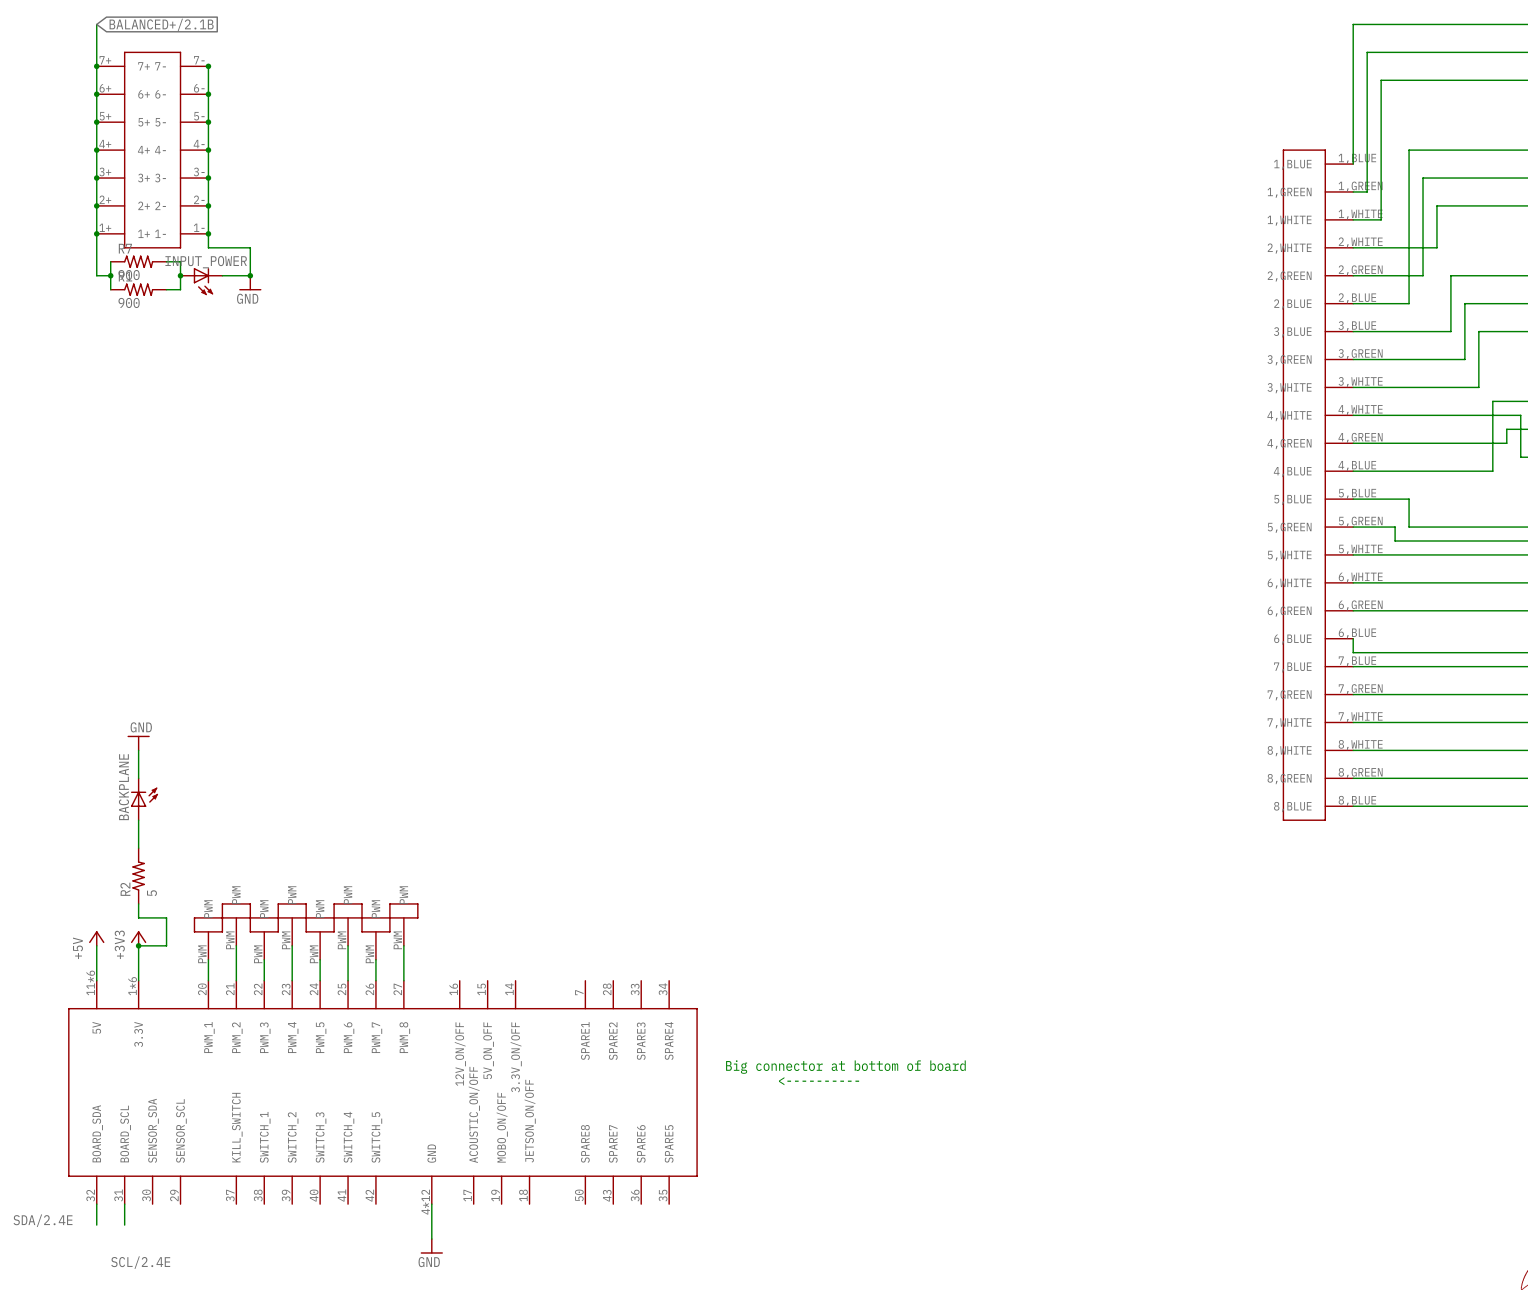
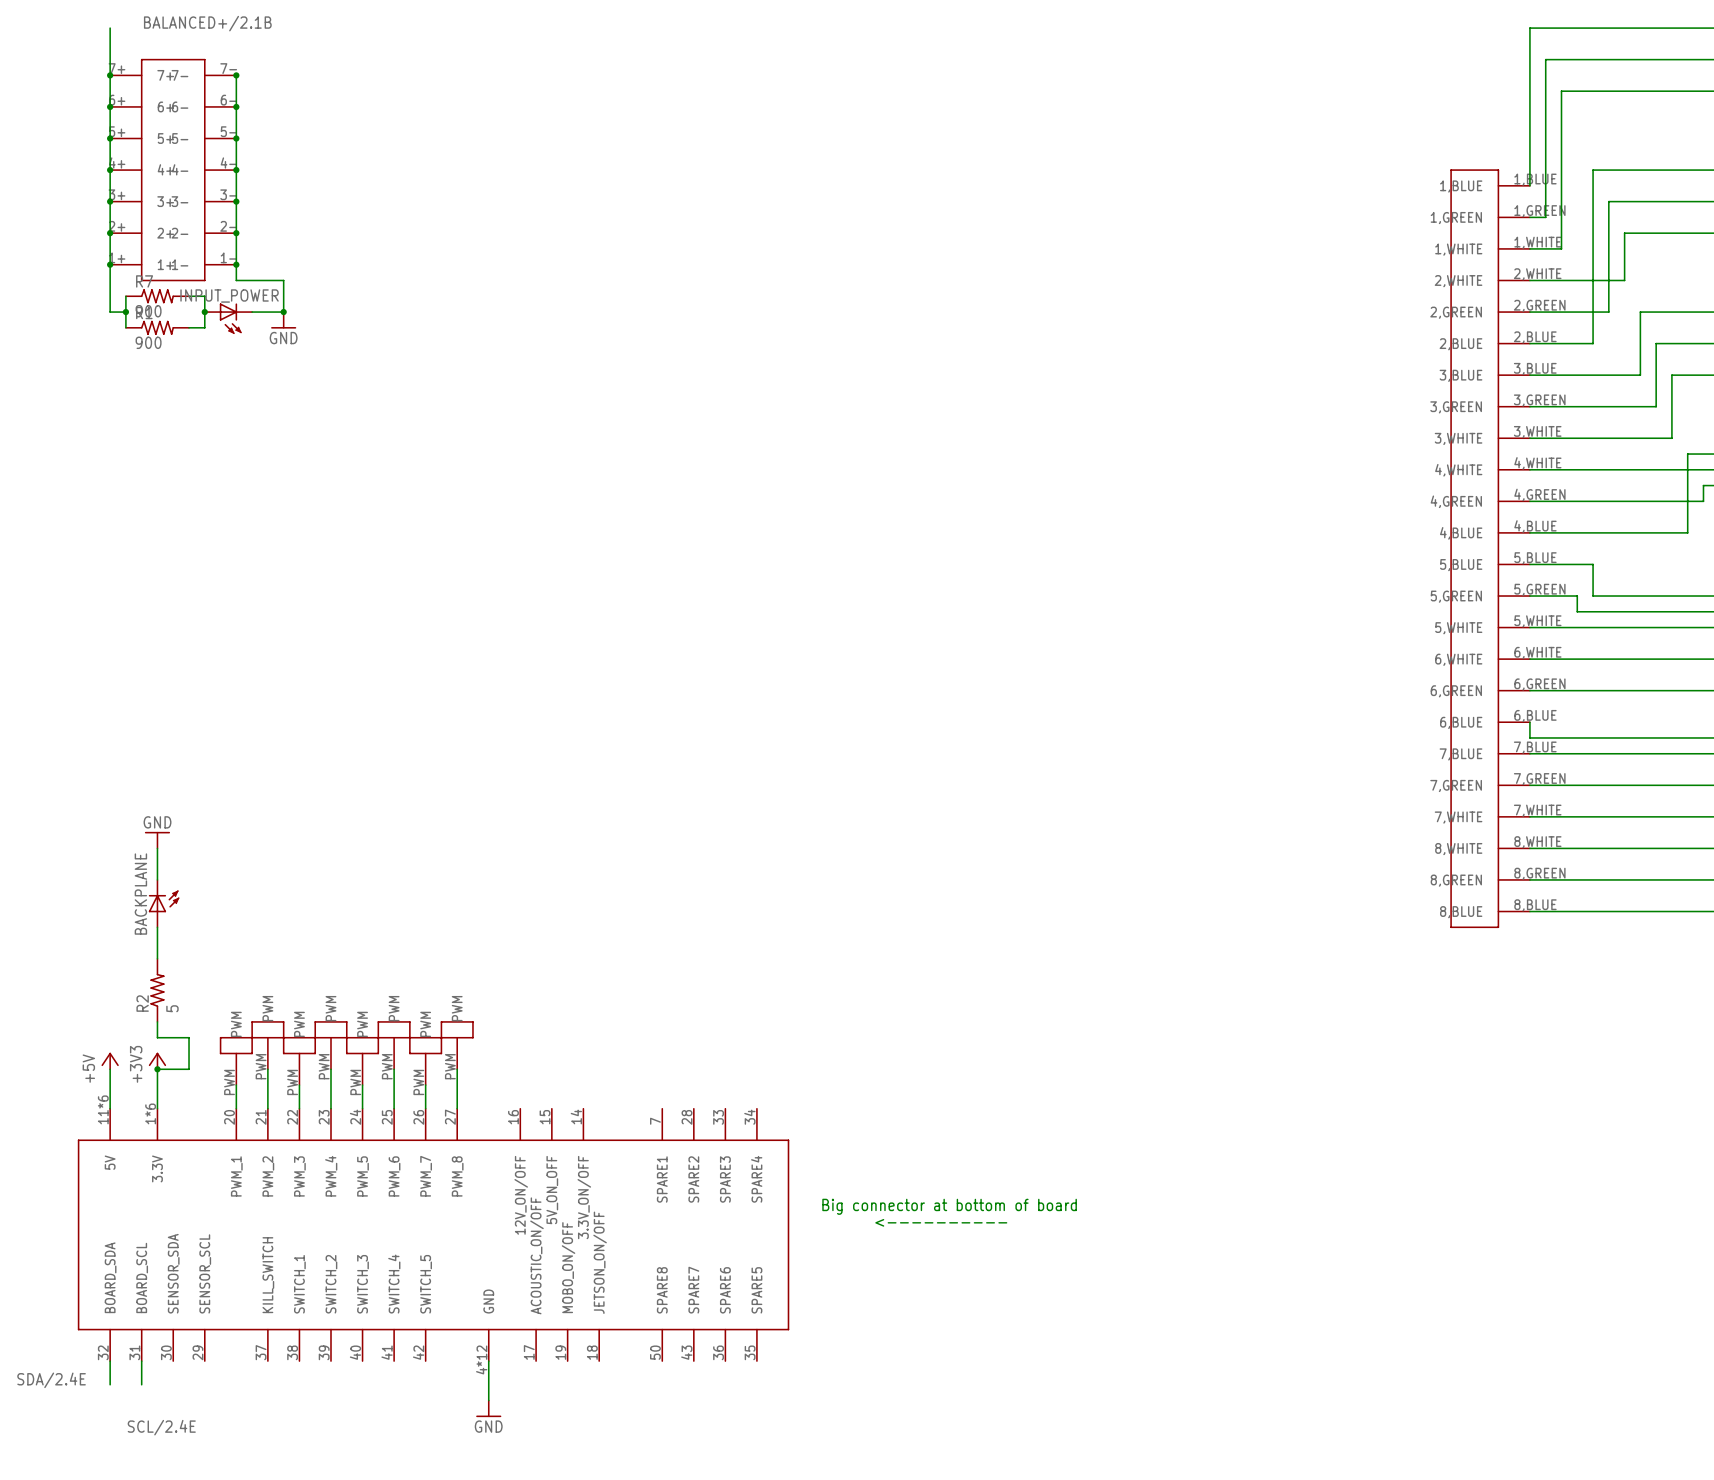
label: none -> BALANCED+/2.1B (207, 23)
global label: BALANCED+/2.1B (161, 24) -> none

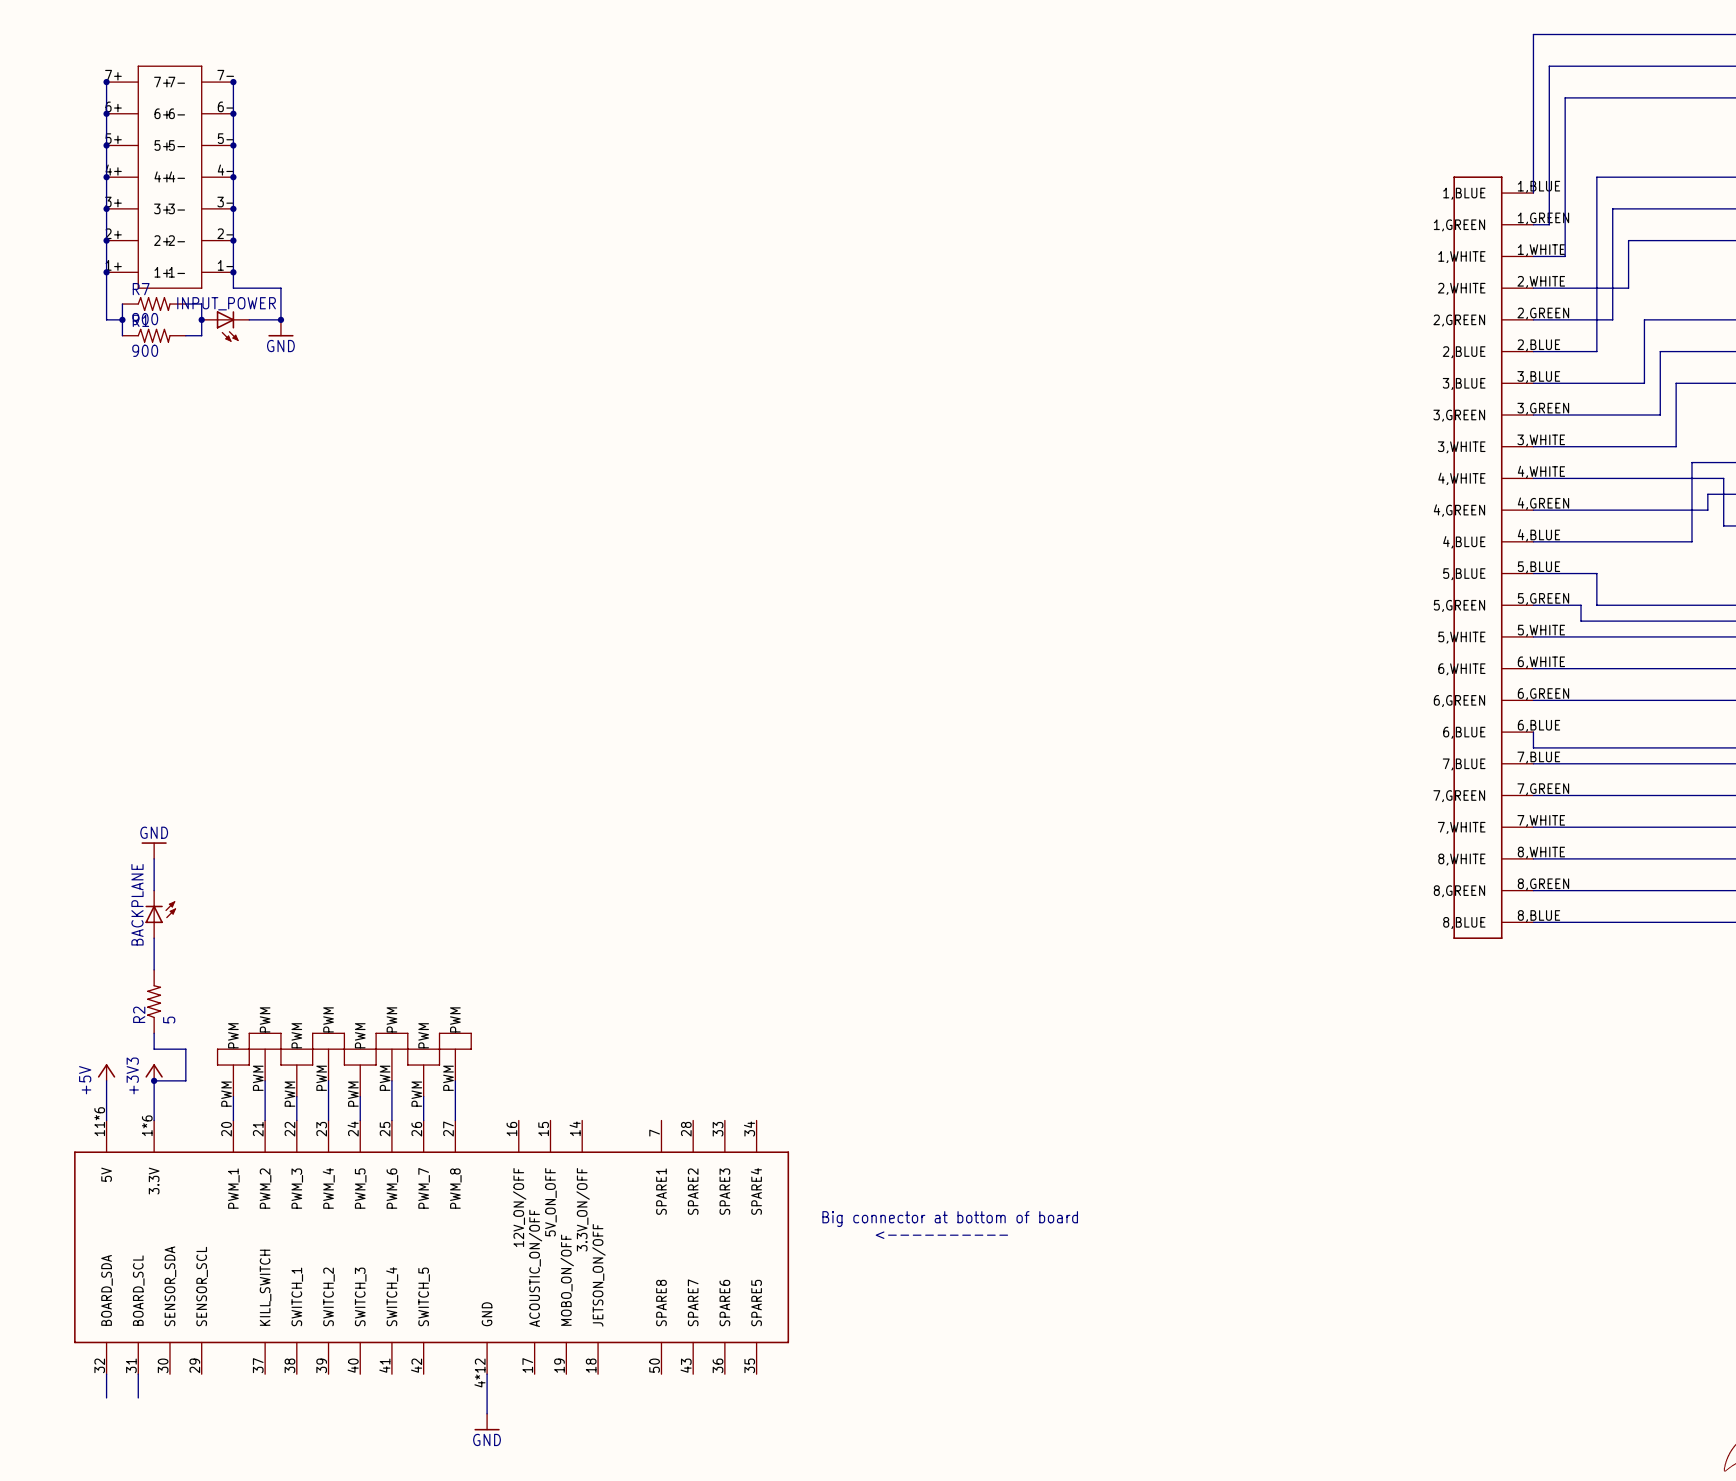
label: BALANCED+/2.1B (207, 23) -> none
wire: (110, 28) (110, 75) -> none
label: SDA/2.4E (51, 1380) -> none
label: SCL/2.4E (161, 1427) -> none

